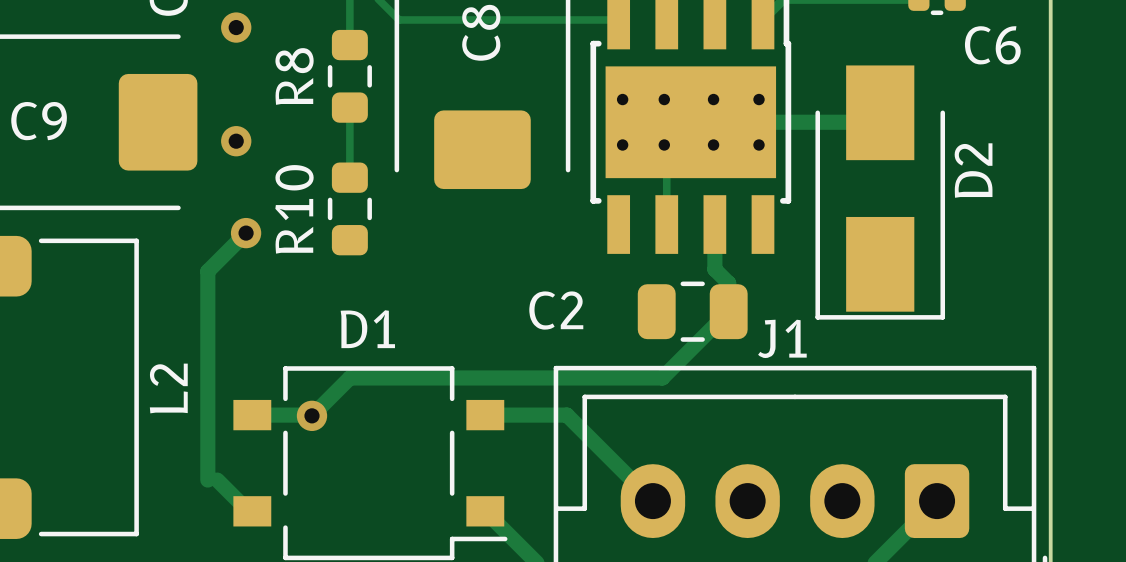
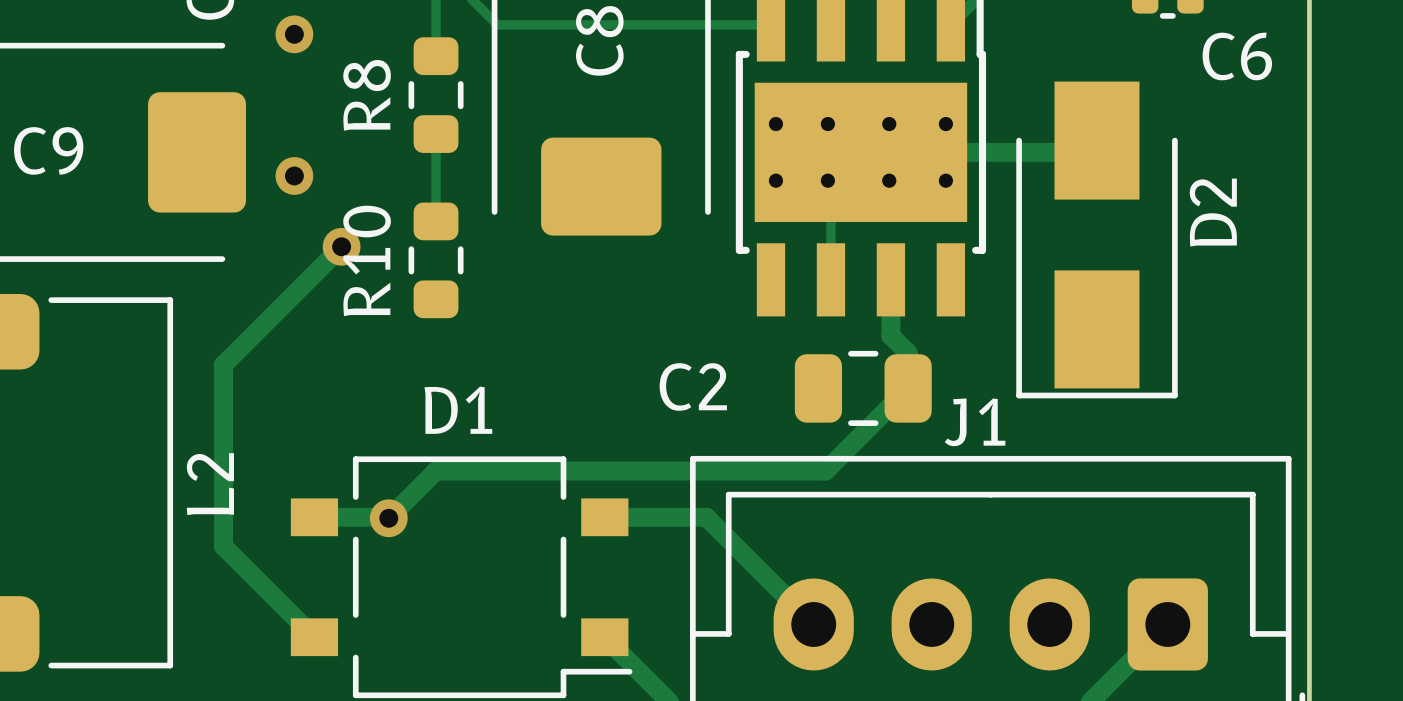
track: (246, 233) (207, 271) (207, 480) -> none
via position: (246, 233) -> (341, 246)
track: (217, 480) (248, 511) (252, 511) -> (341, 246) (223, 364) (223, 546) (314, 637)

